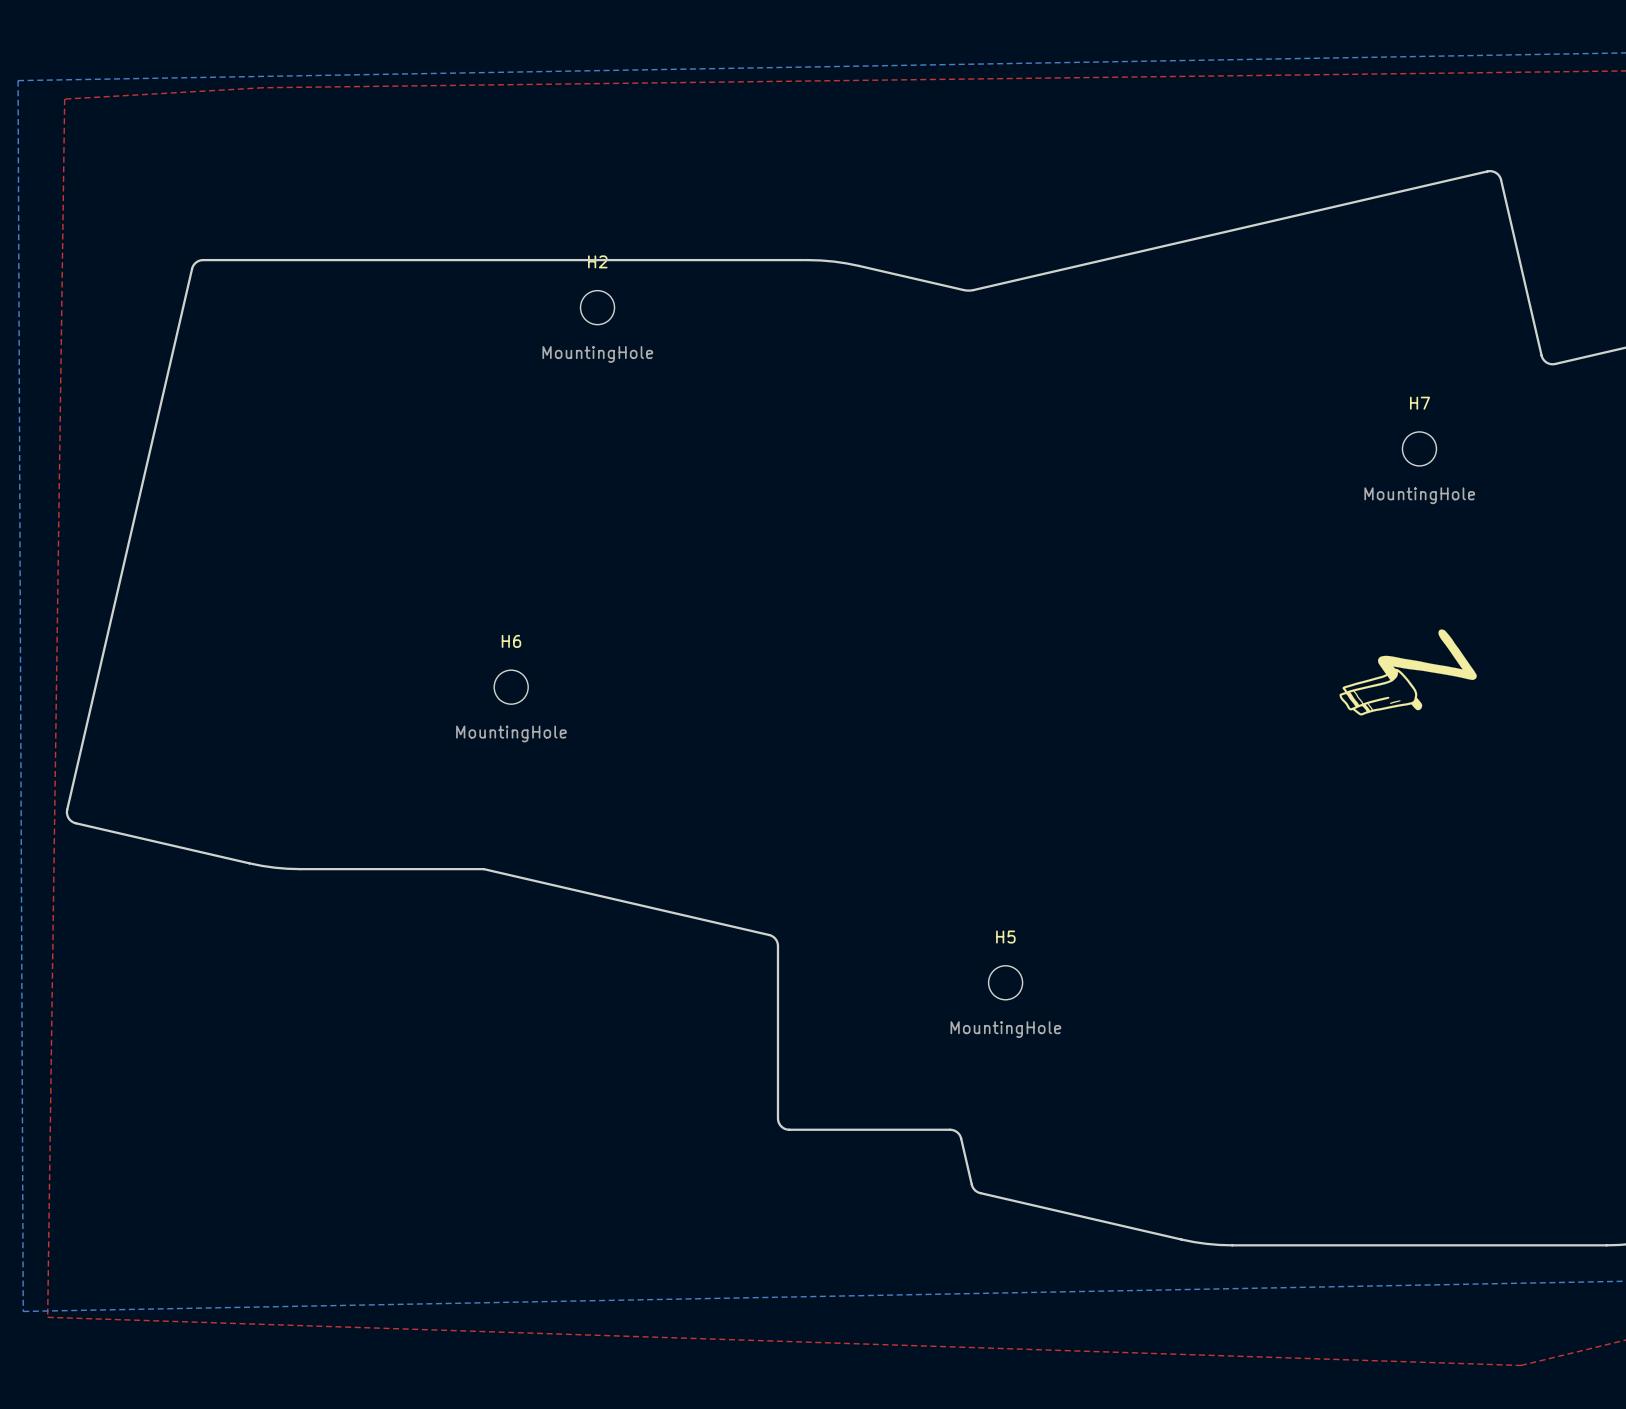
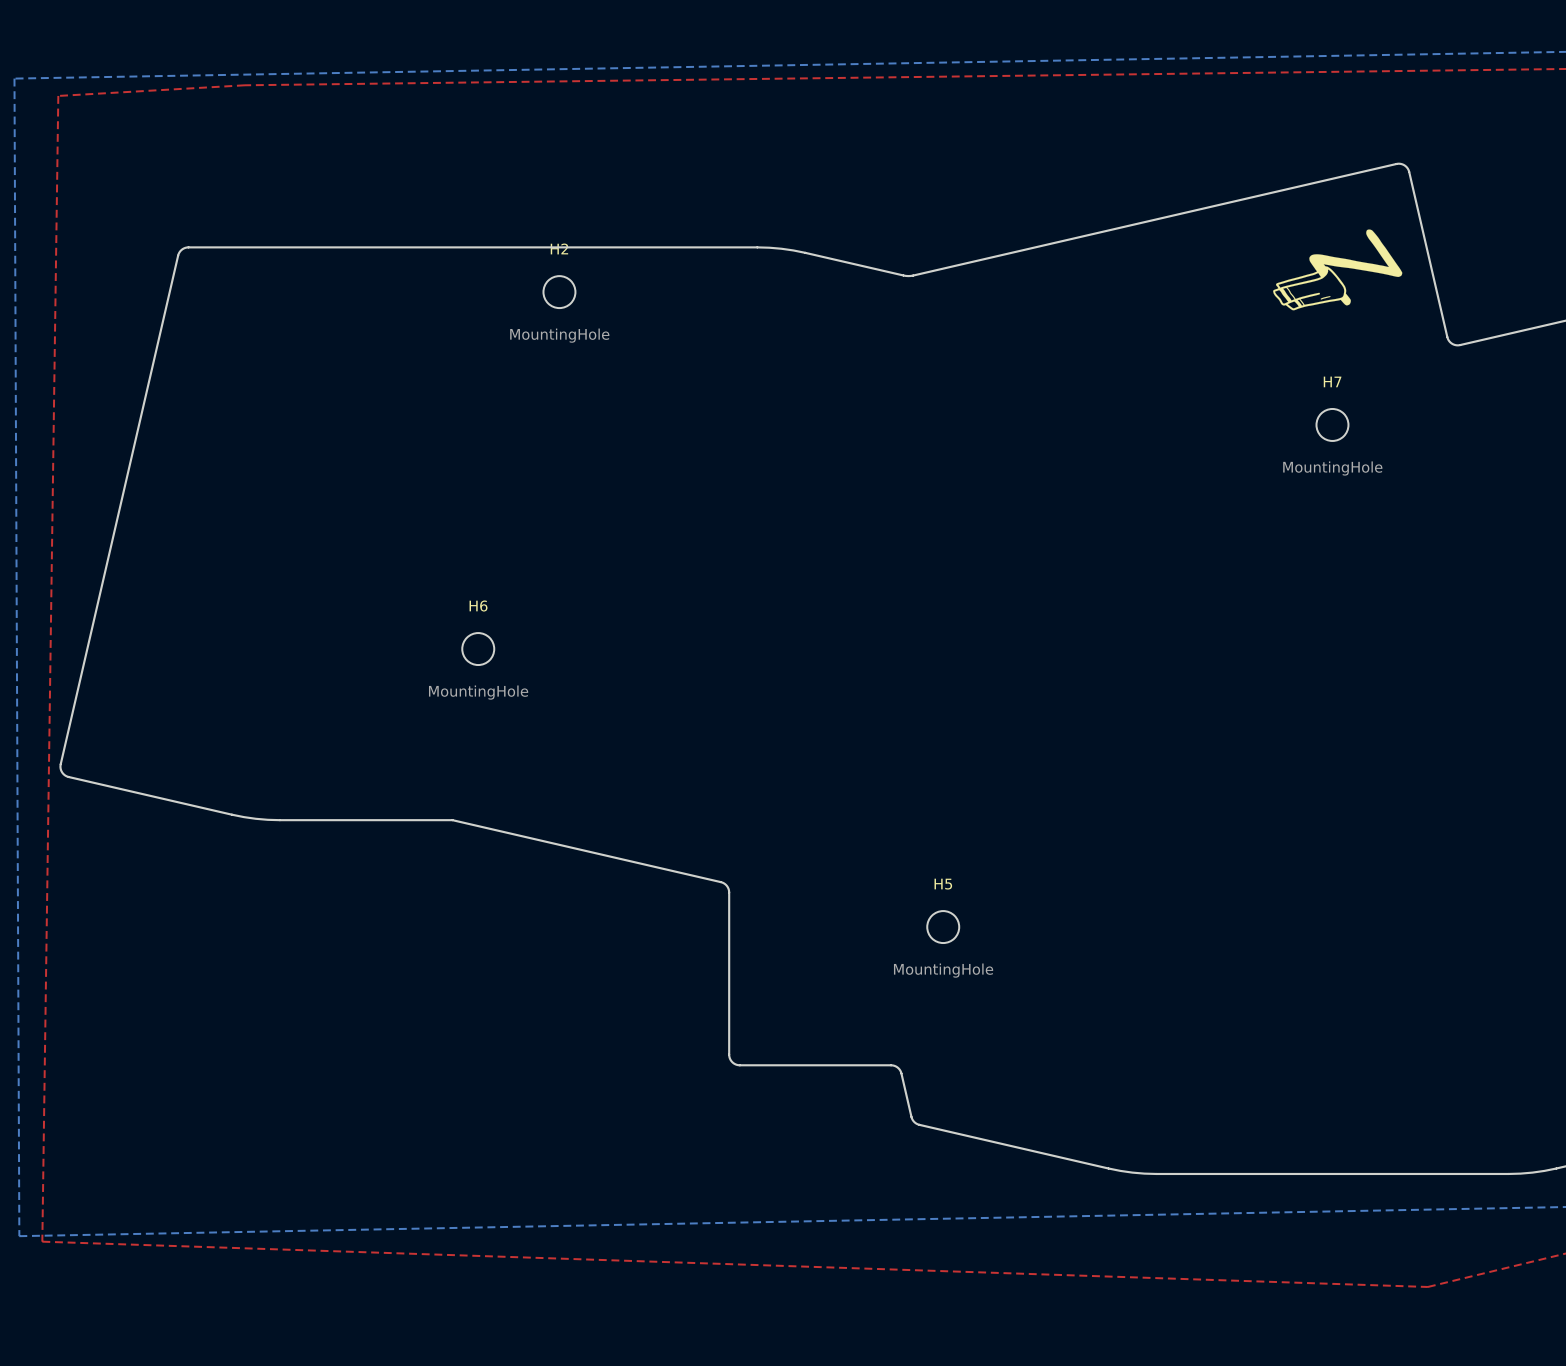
drawing: none -> [1273, 229, 1403, 311]
drawing: [1339, 629, 1477, 716] -> none

